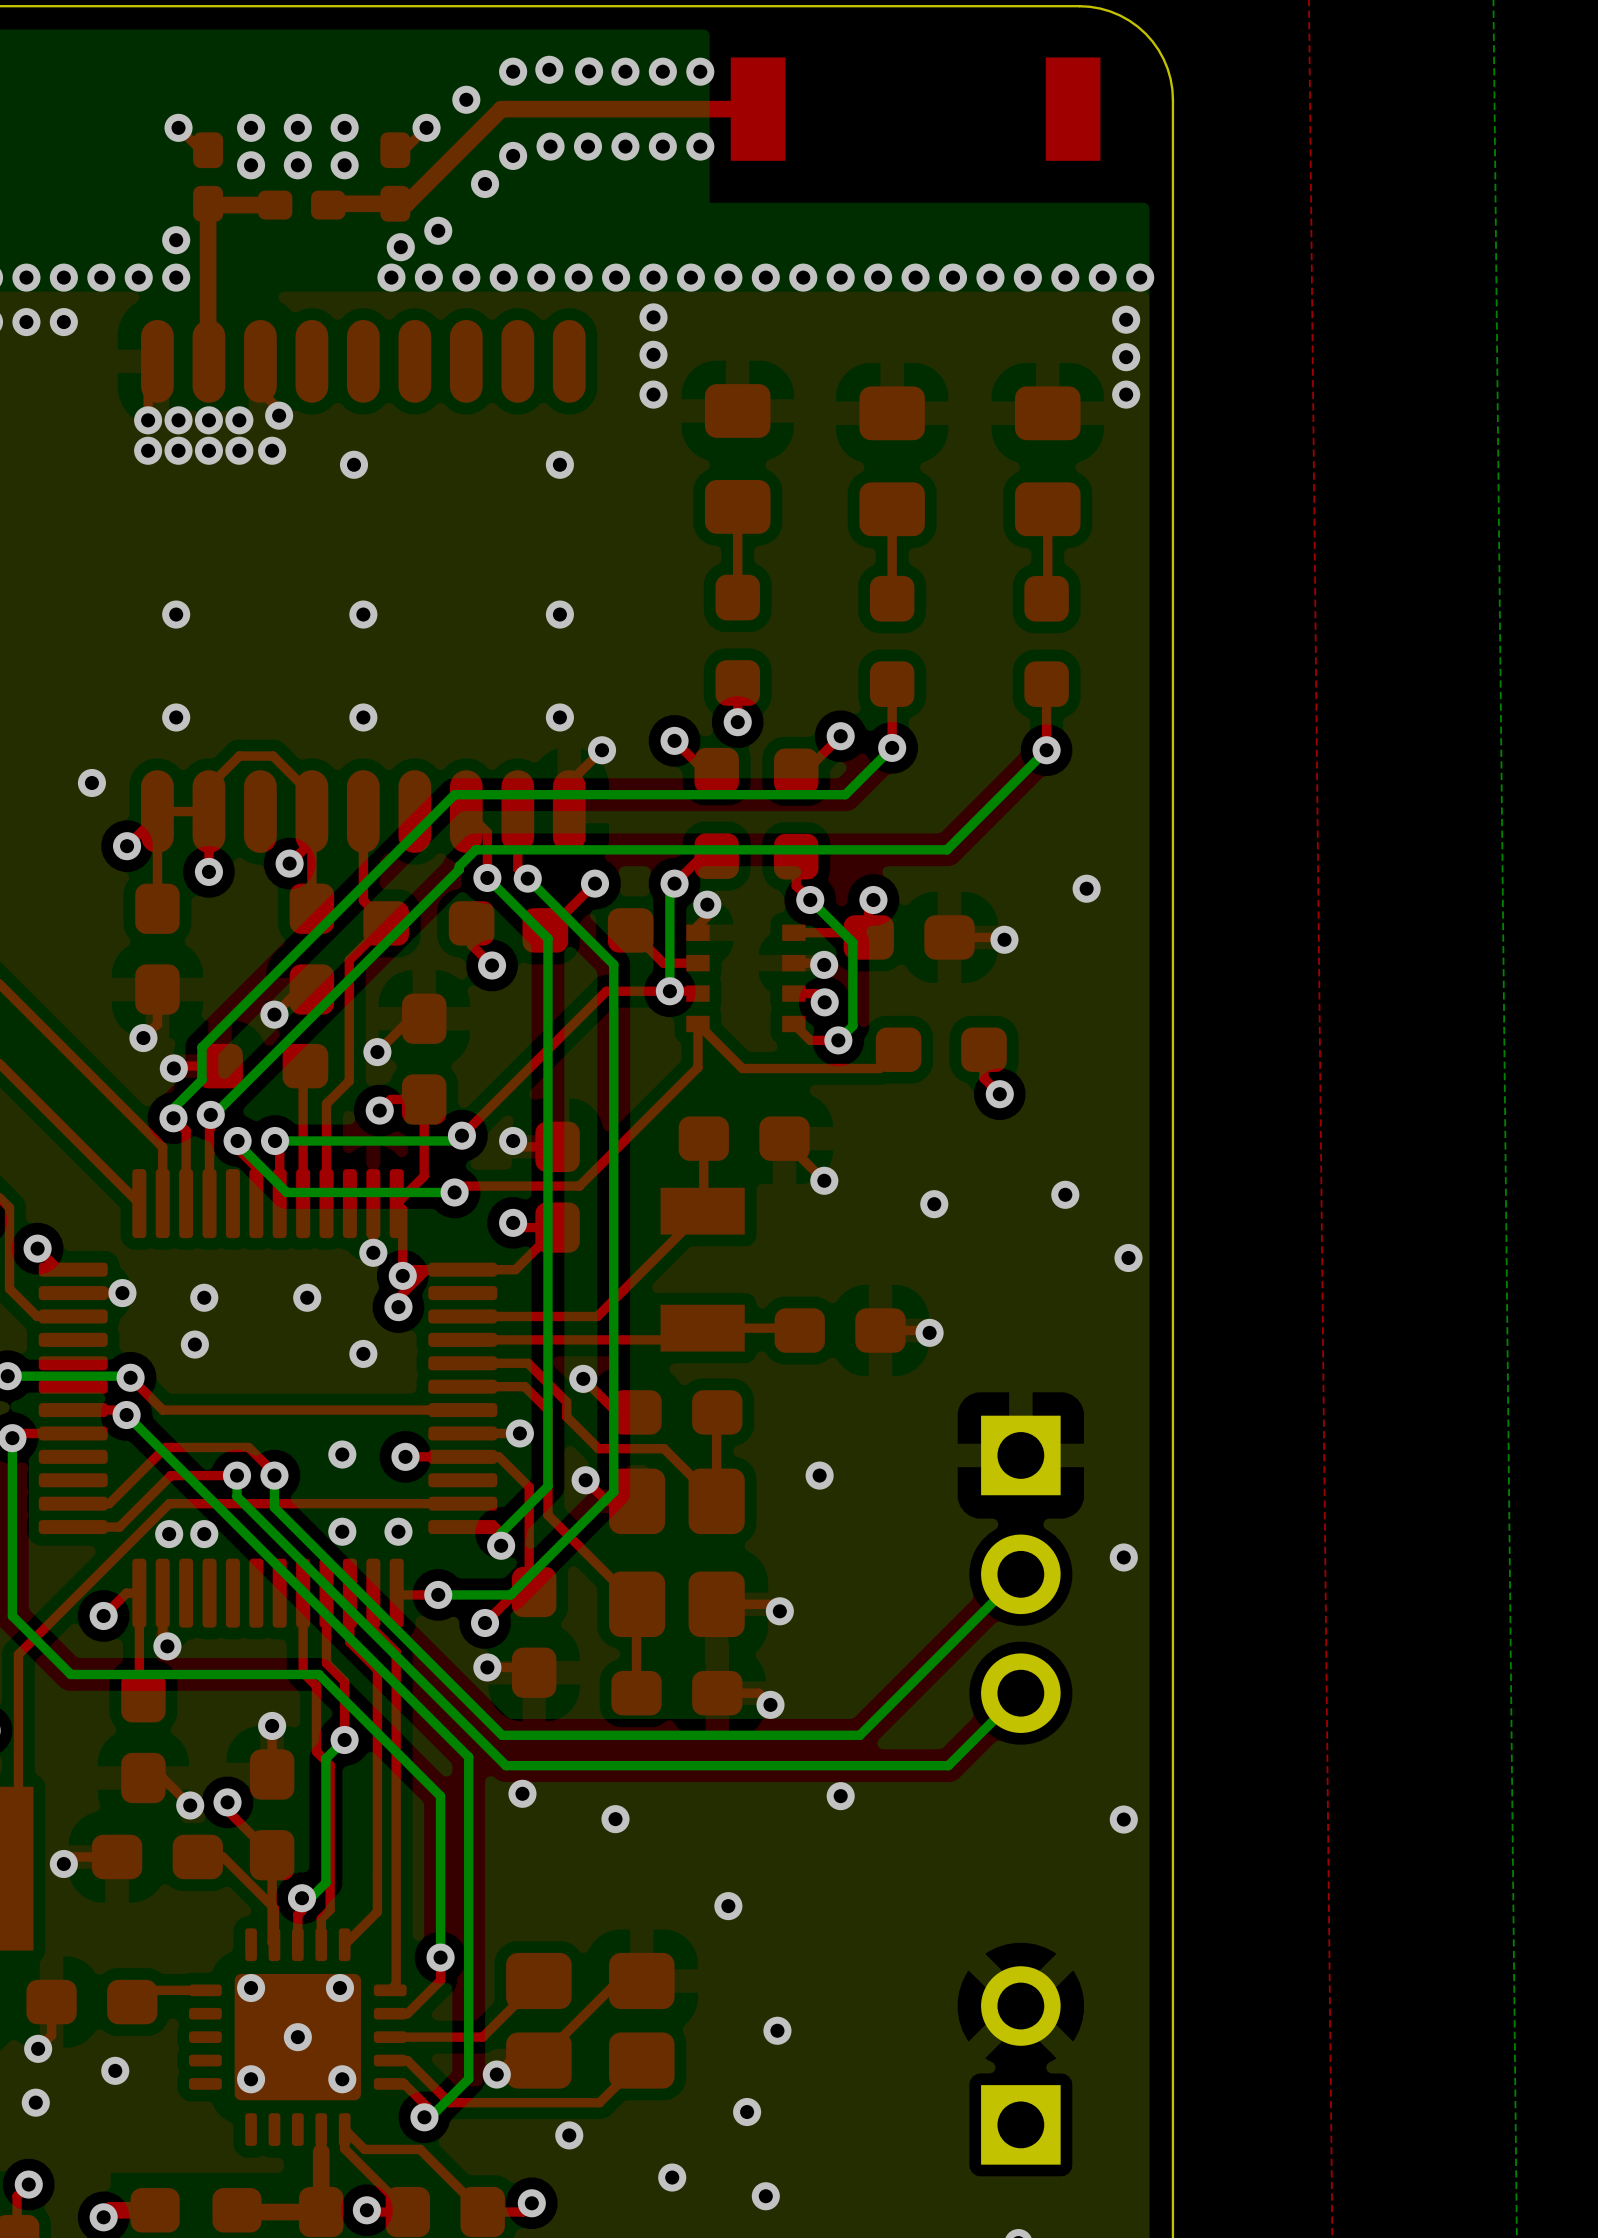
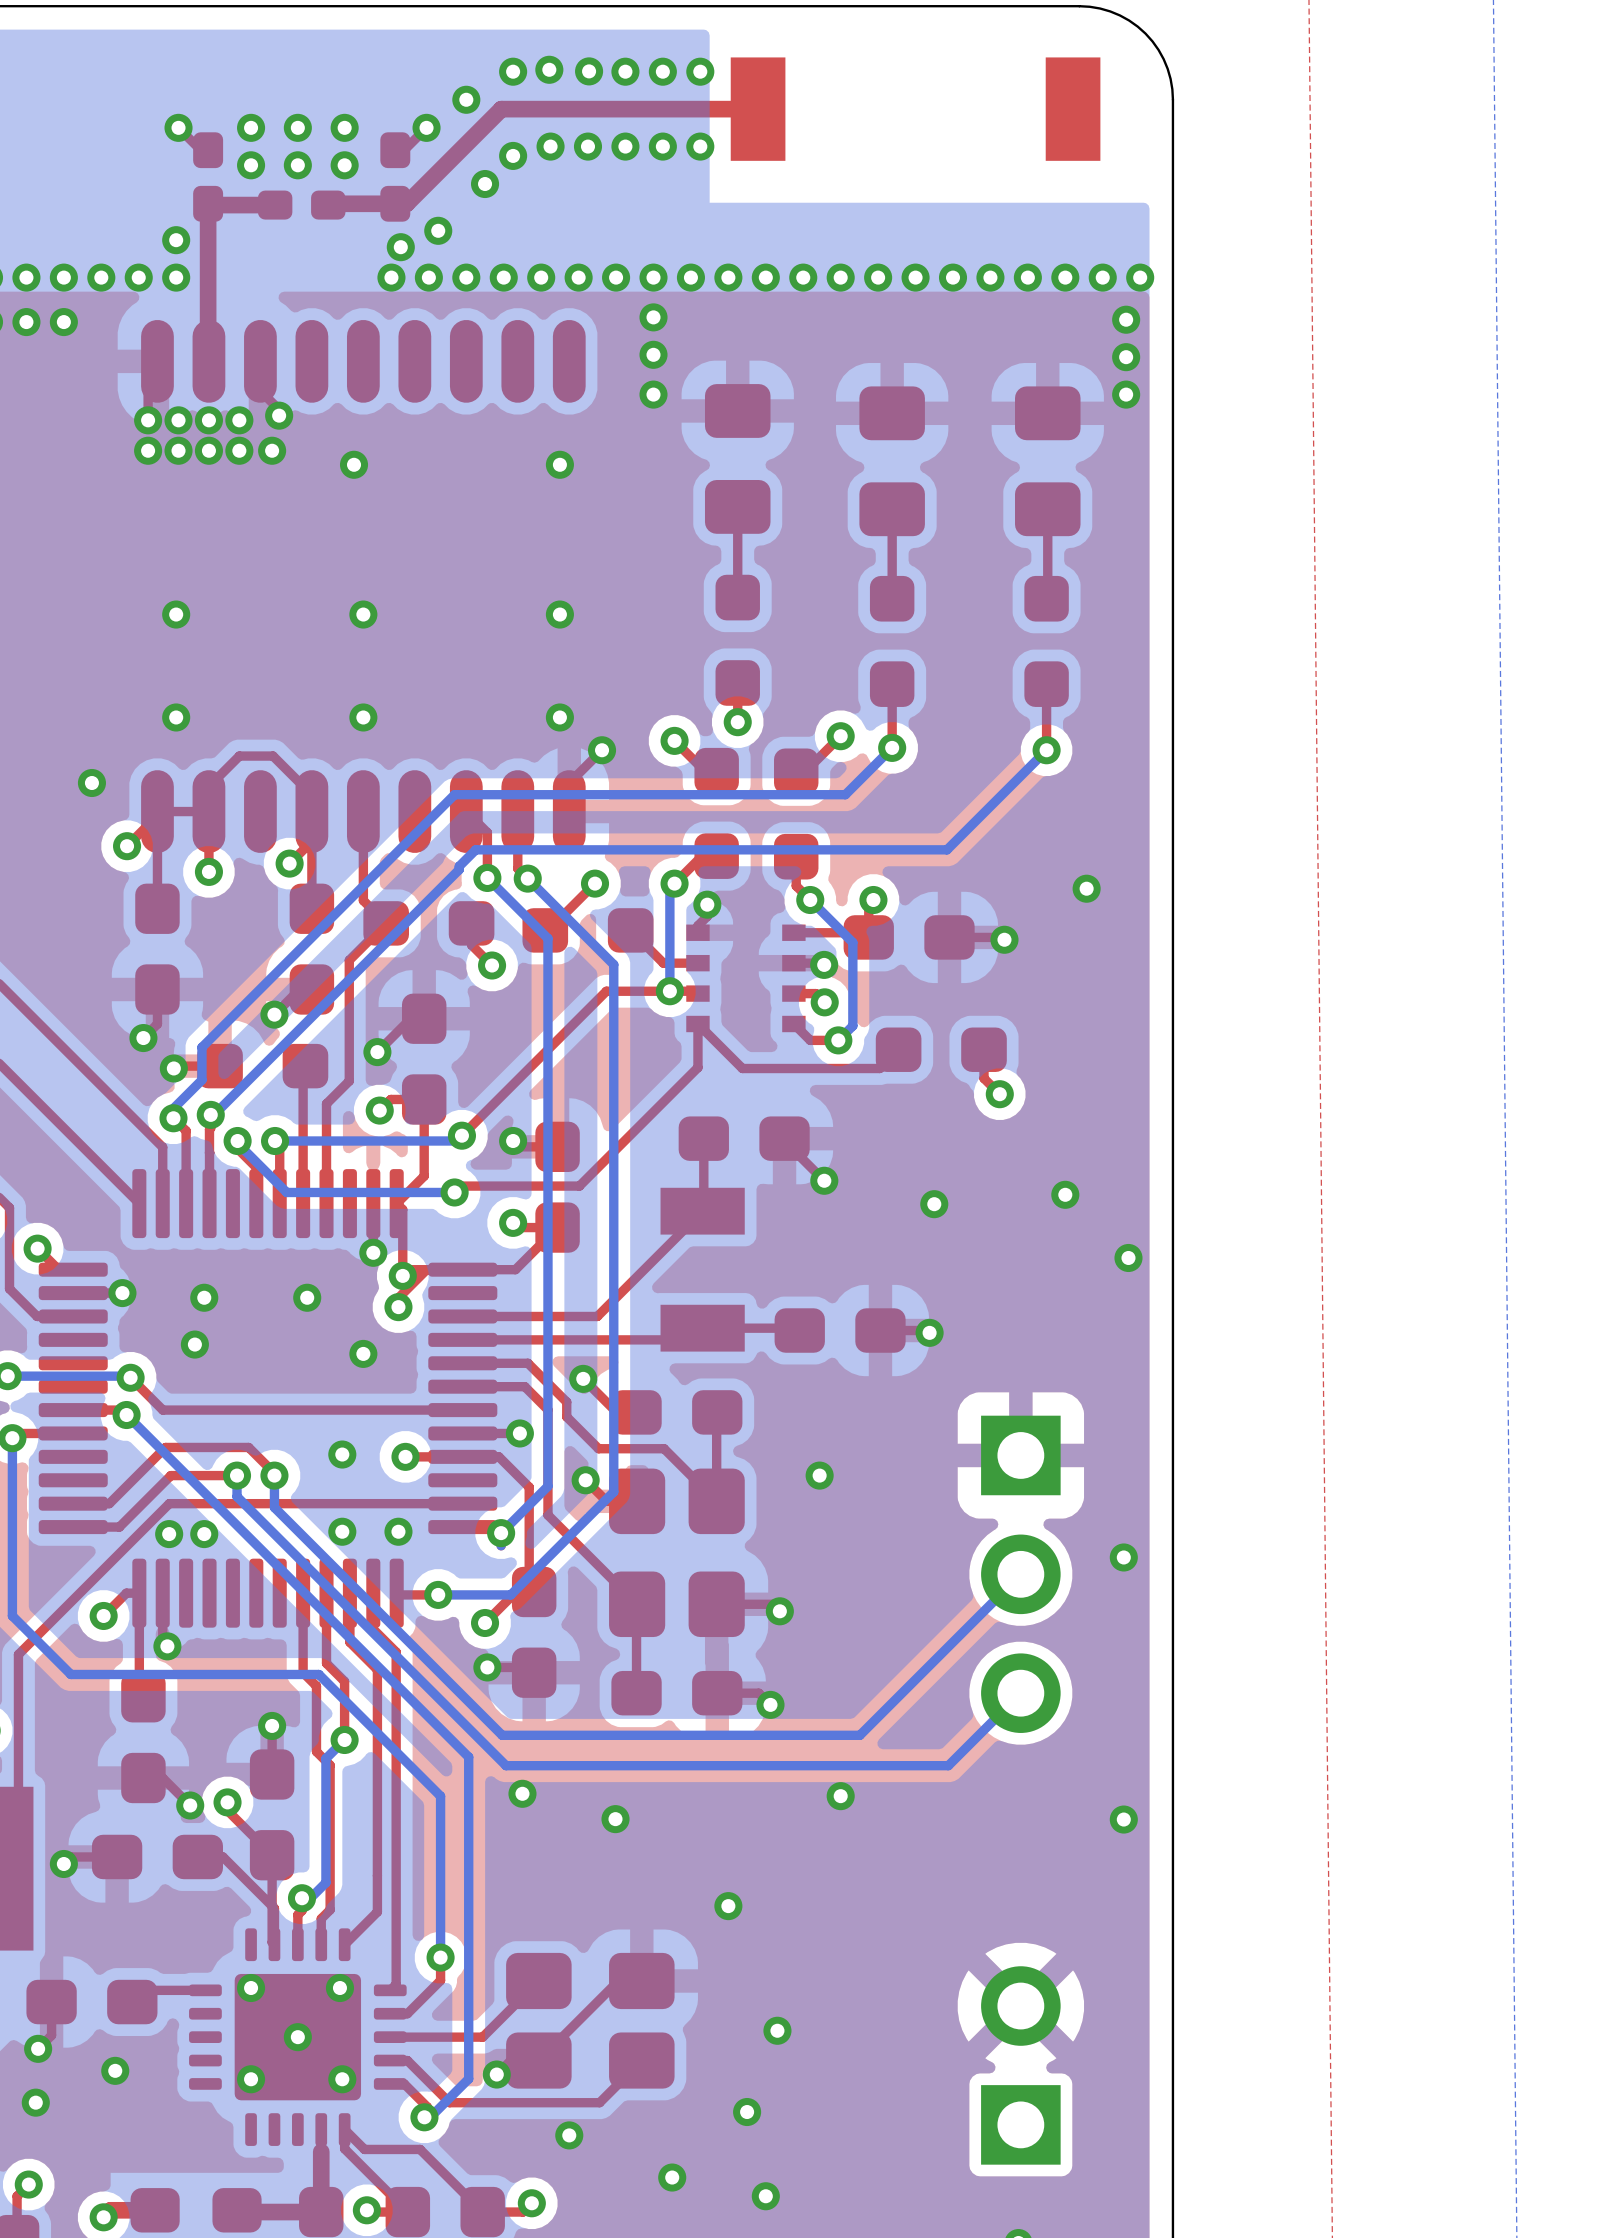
via position: (501, 1545) -> (501, 1533)

